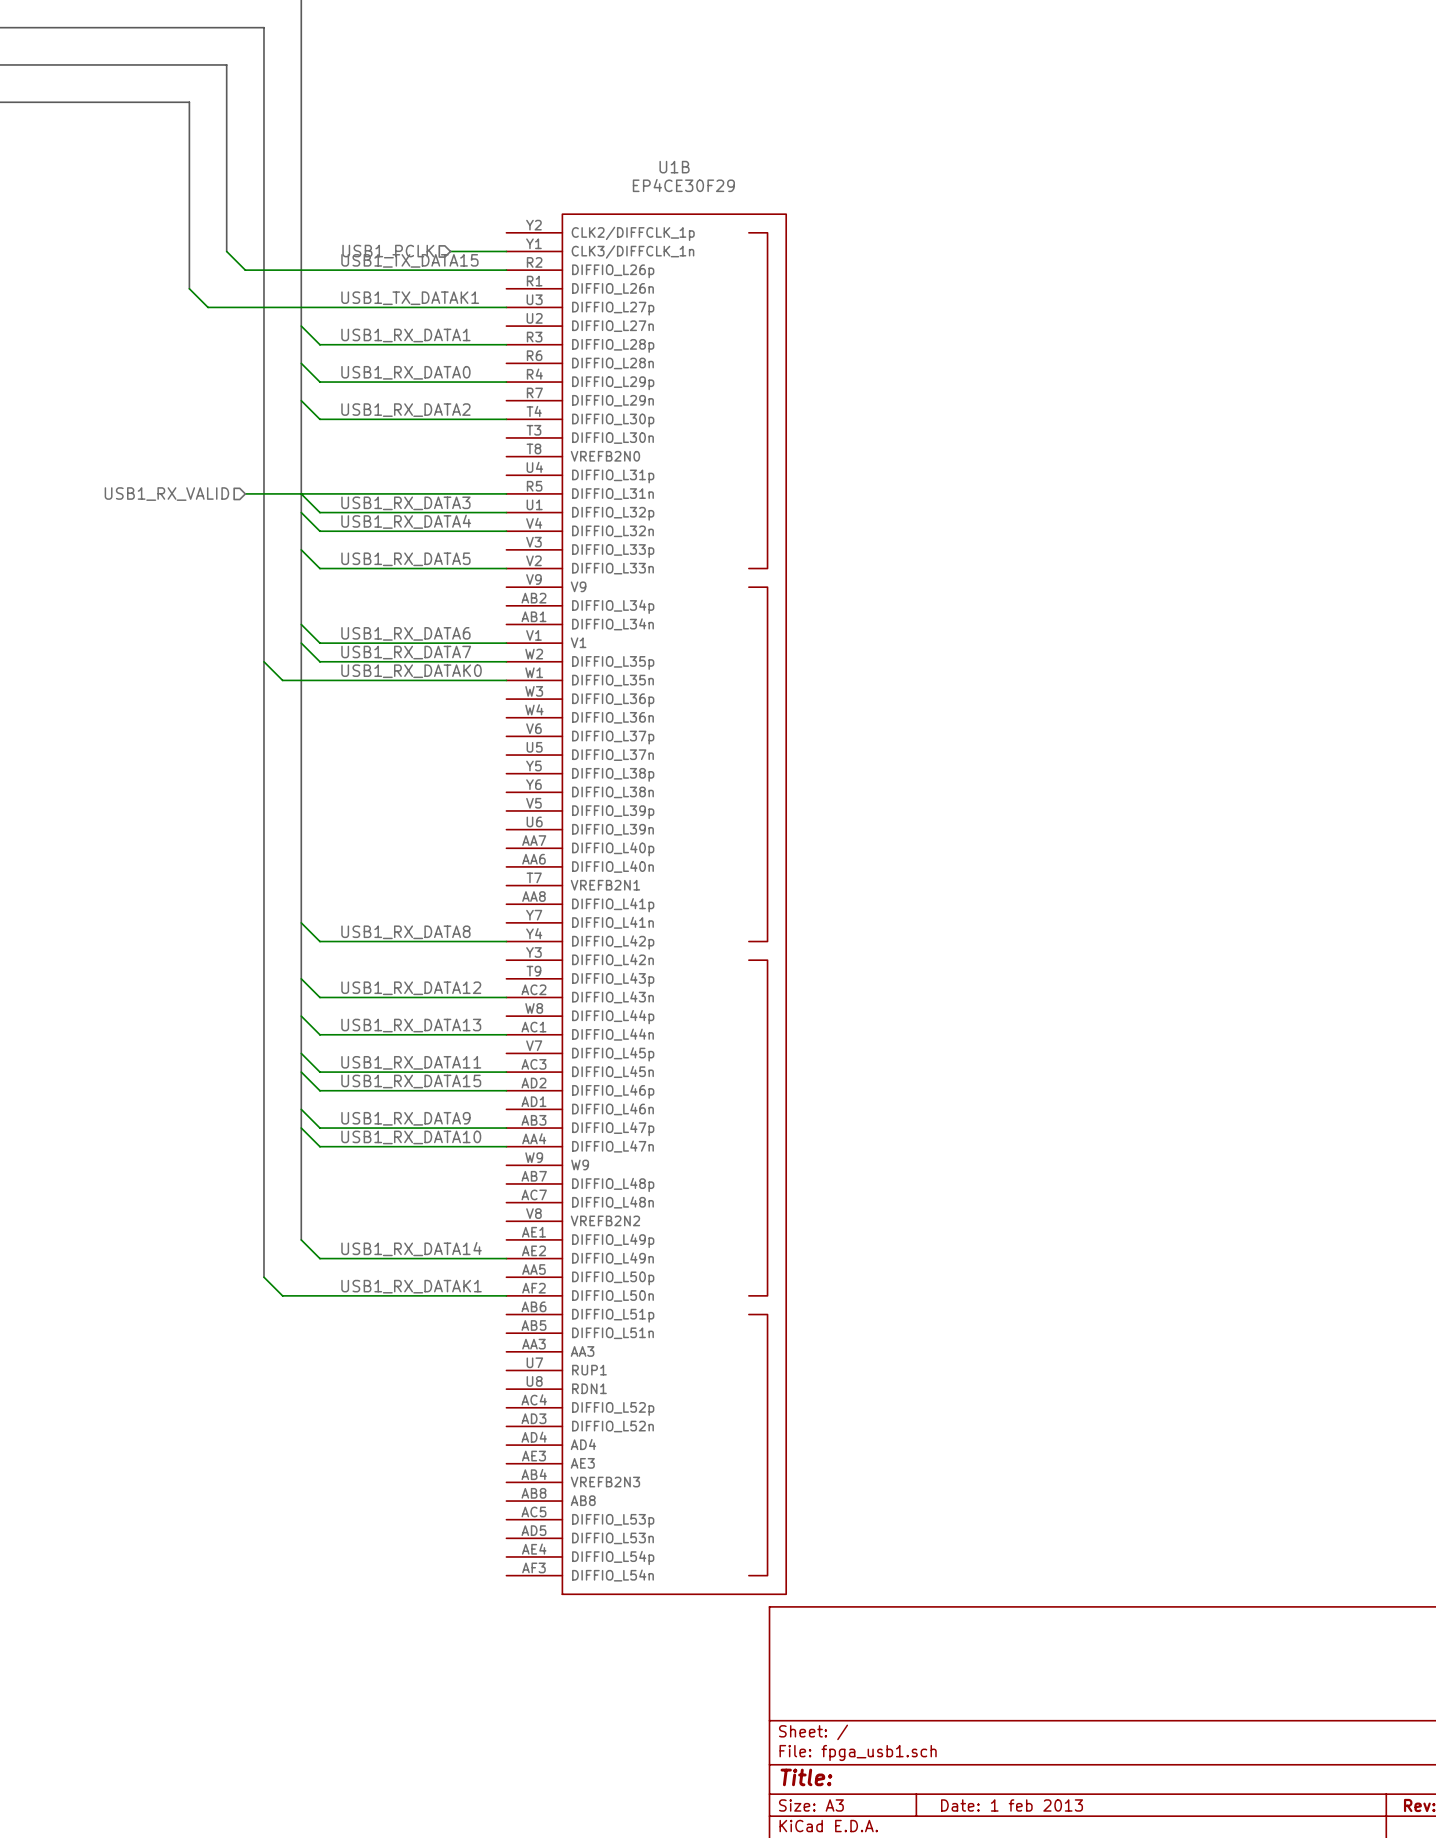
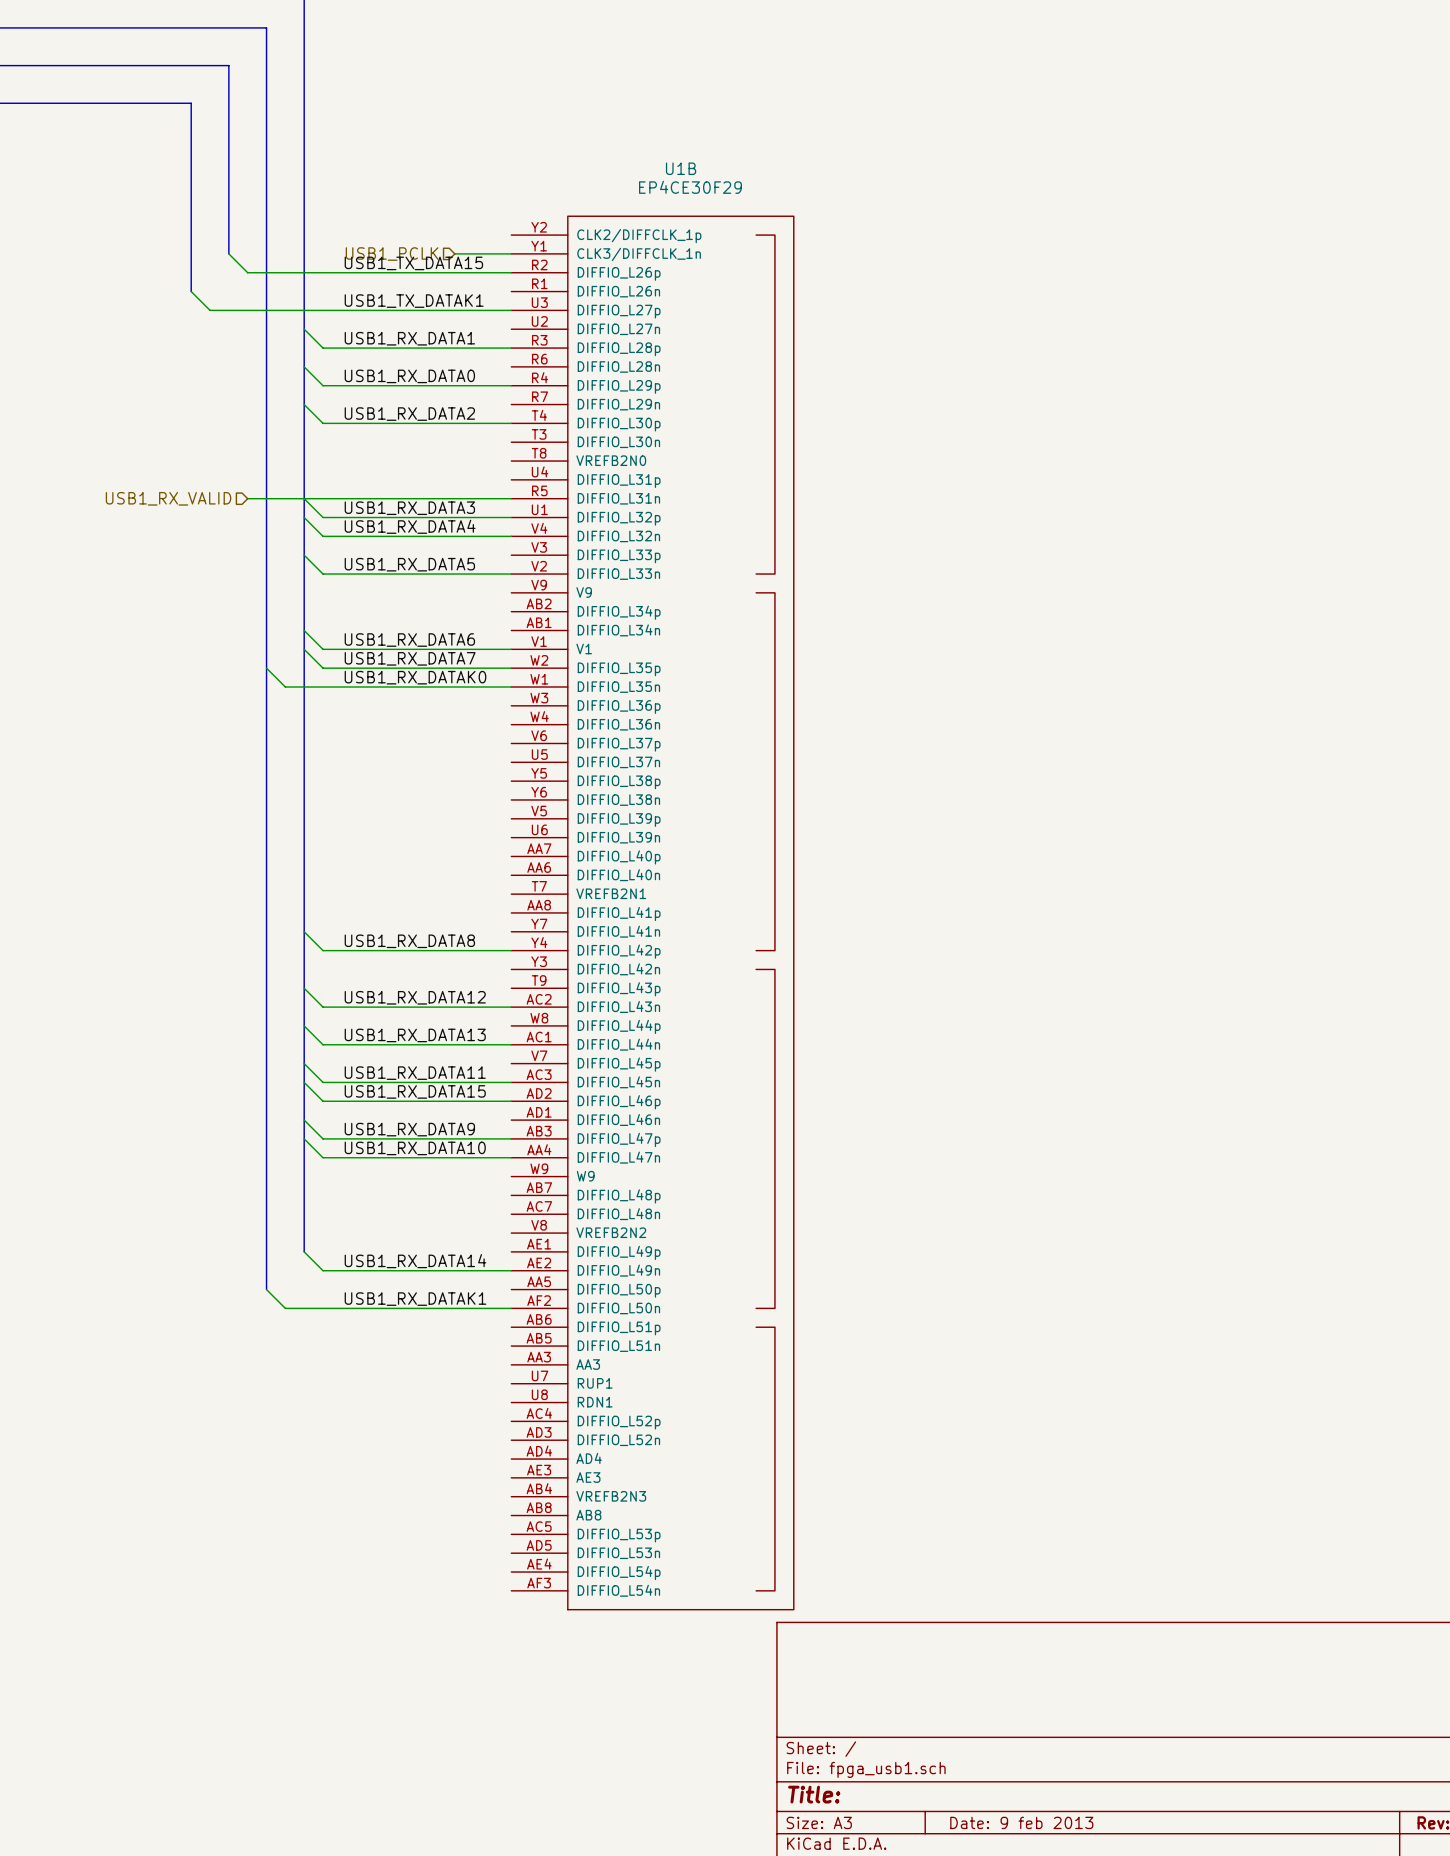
title block: Date: 1 feb 2013 (1012, 1805) -> Date: 9 feb 2013 (1021, 1822)

